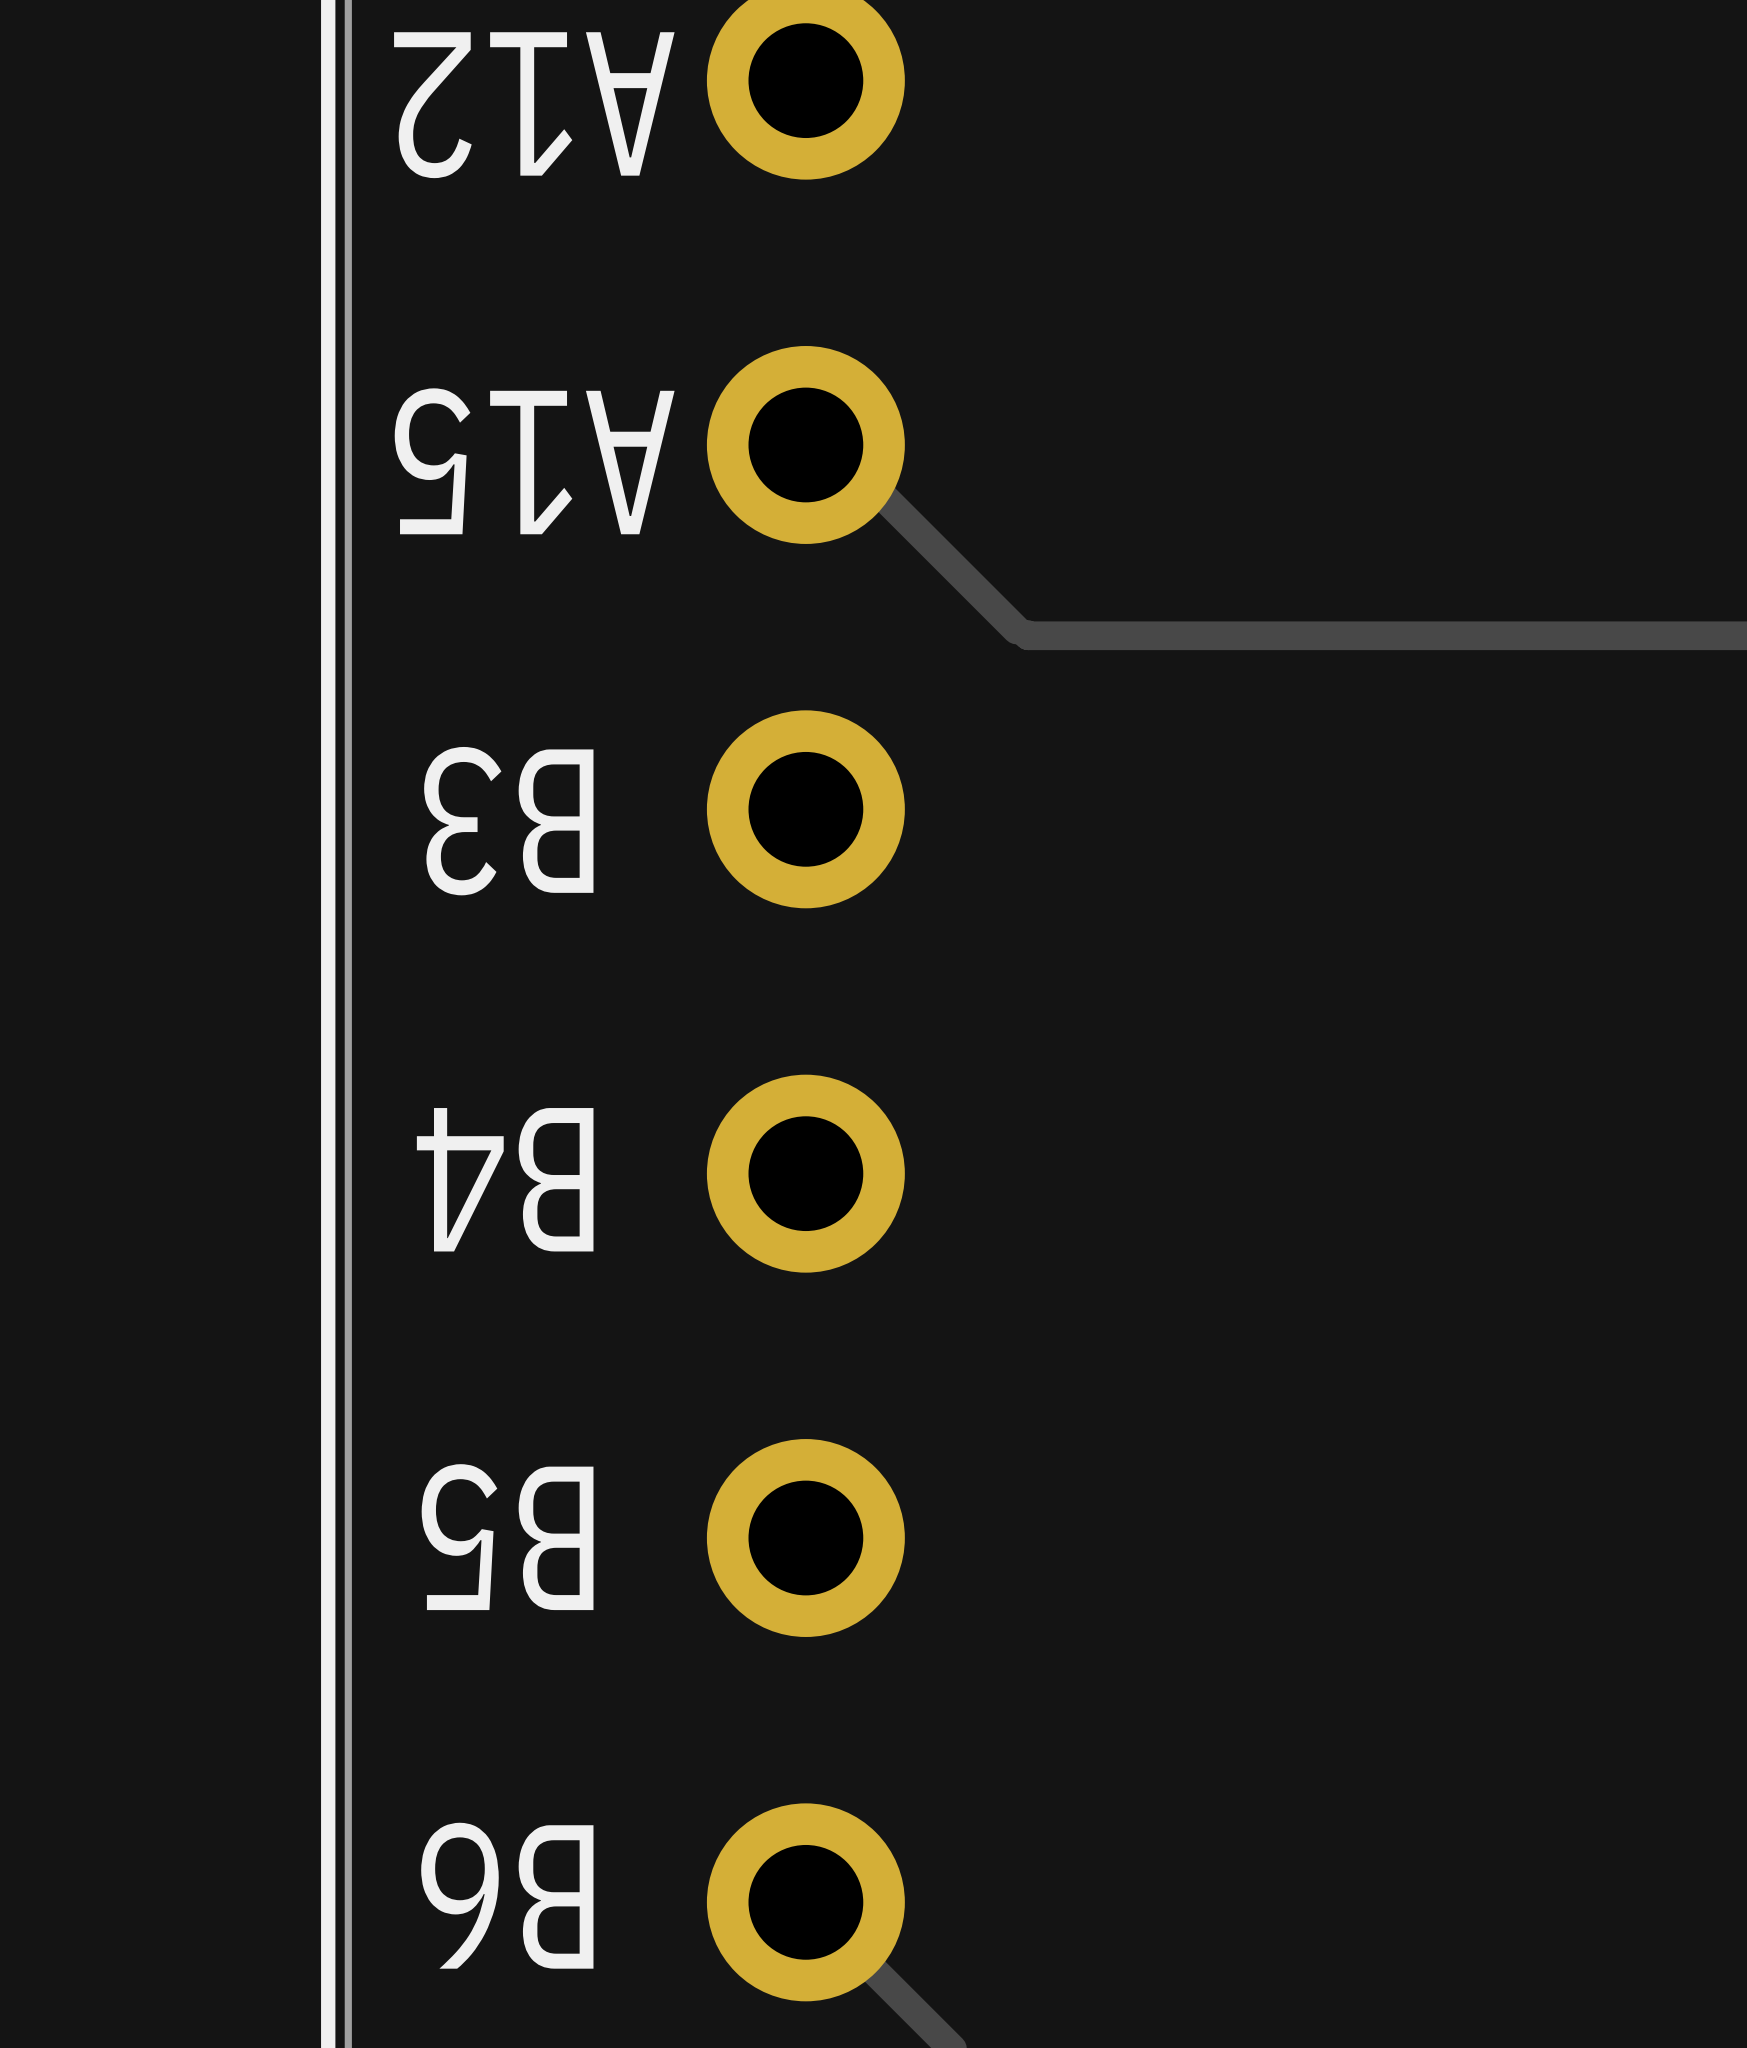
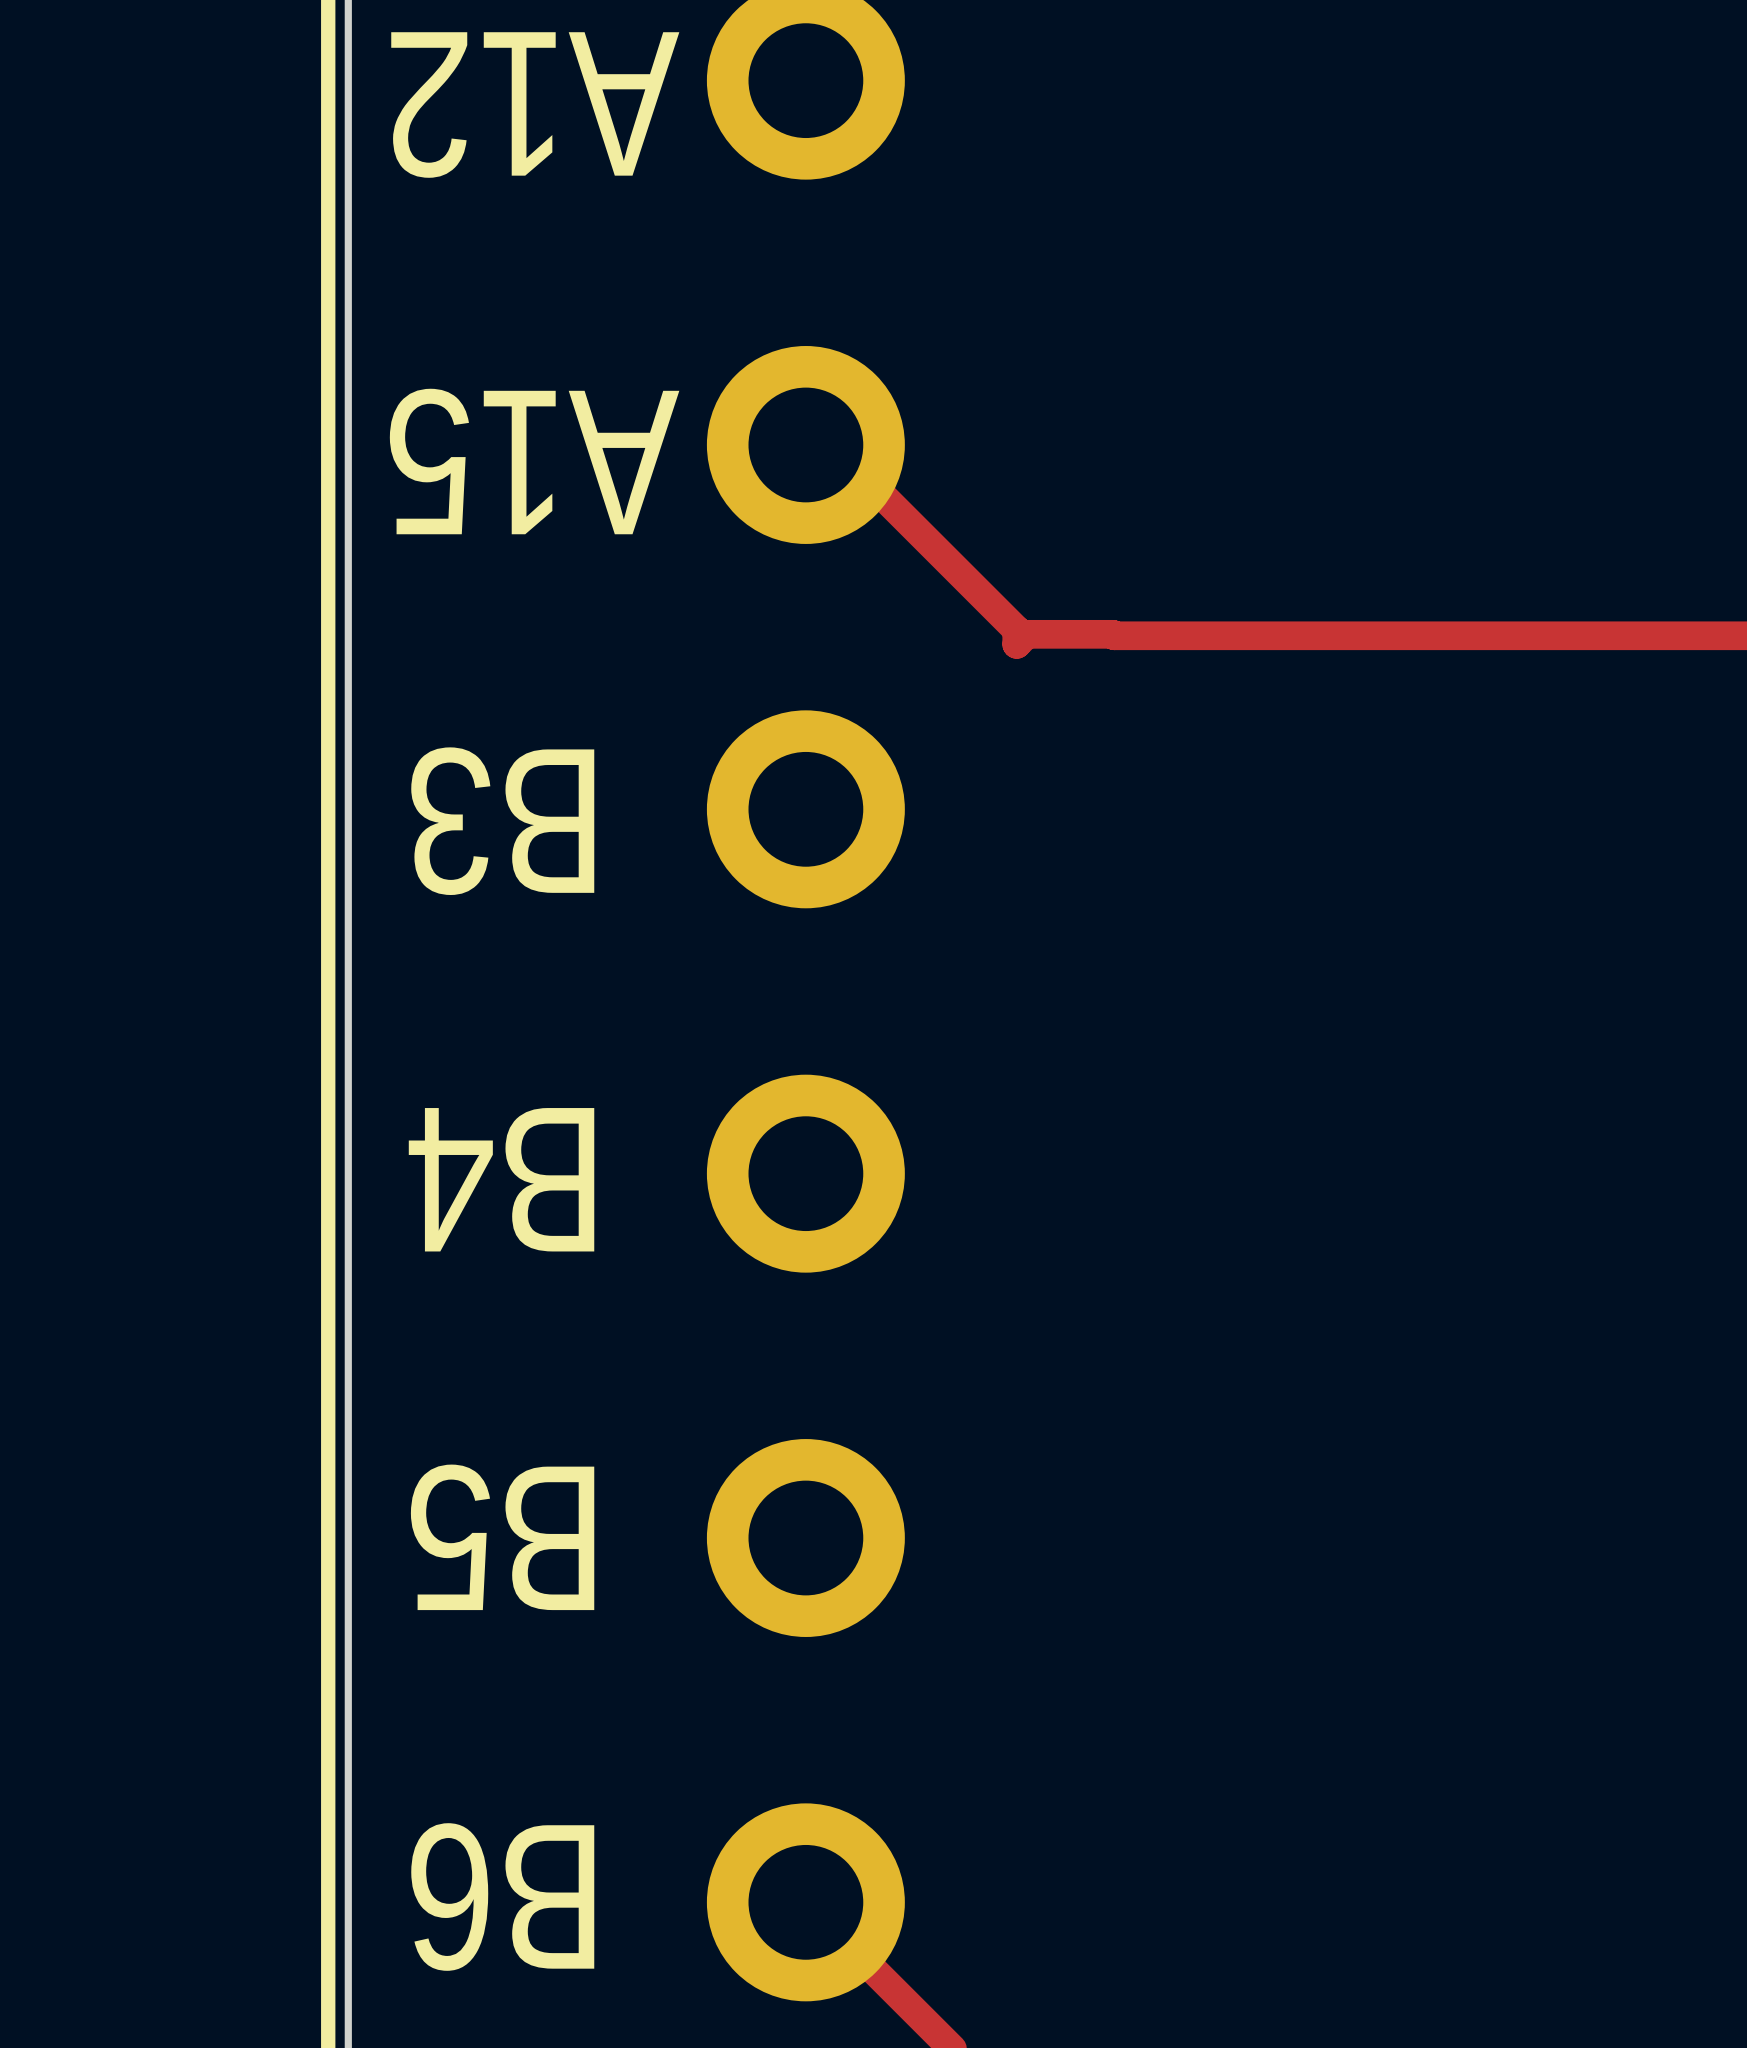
track: (1028, 635) (1114, 635) -> (1016, 630) (1016, 644) (1026, 634) (1112, 634)

